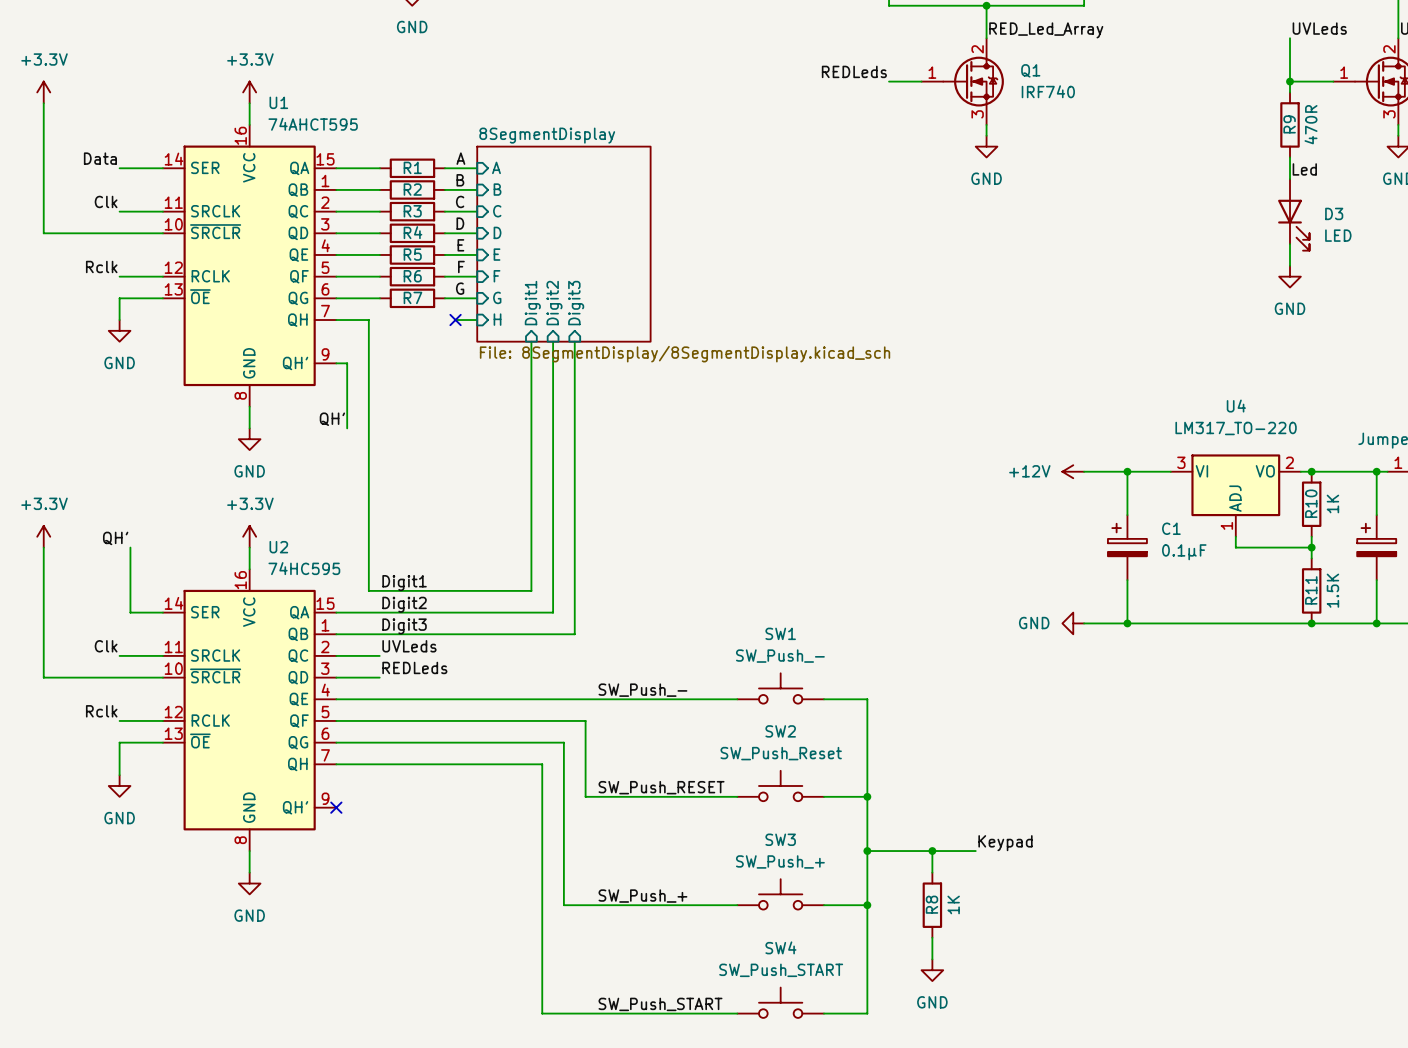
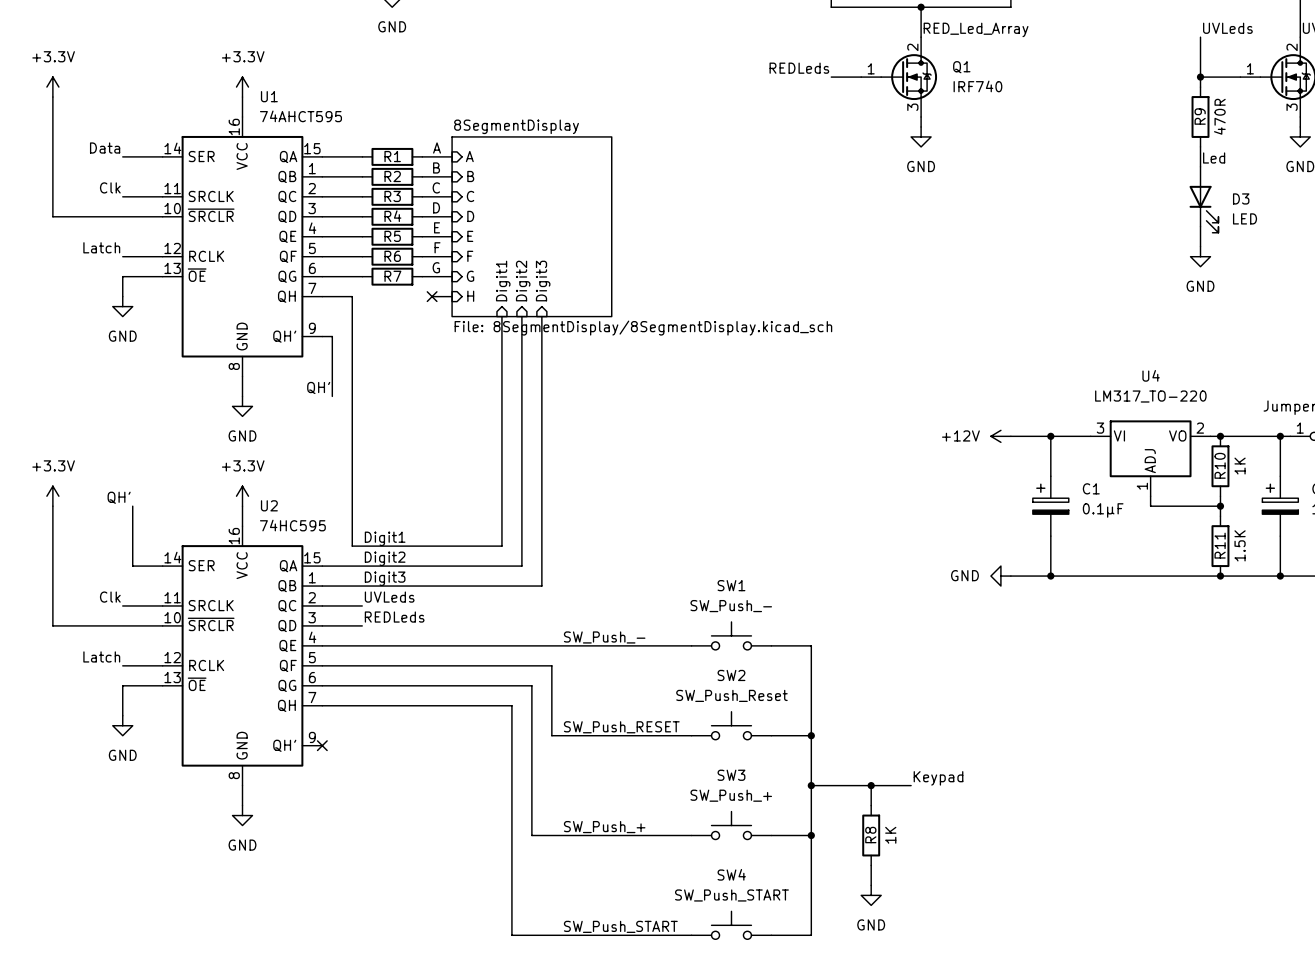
label: Rclk (101, 266) -> Latch (101, 247)
label: Rclk (101, 711) -> Latch (101, 656)

